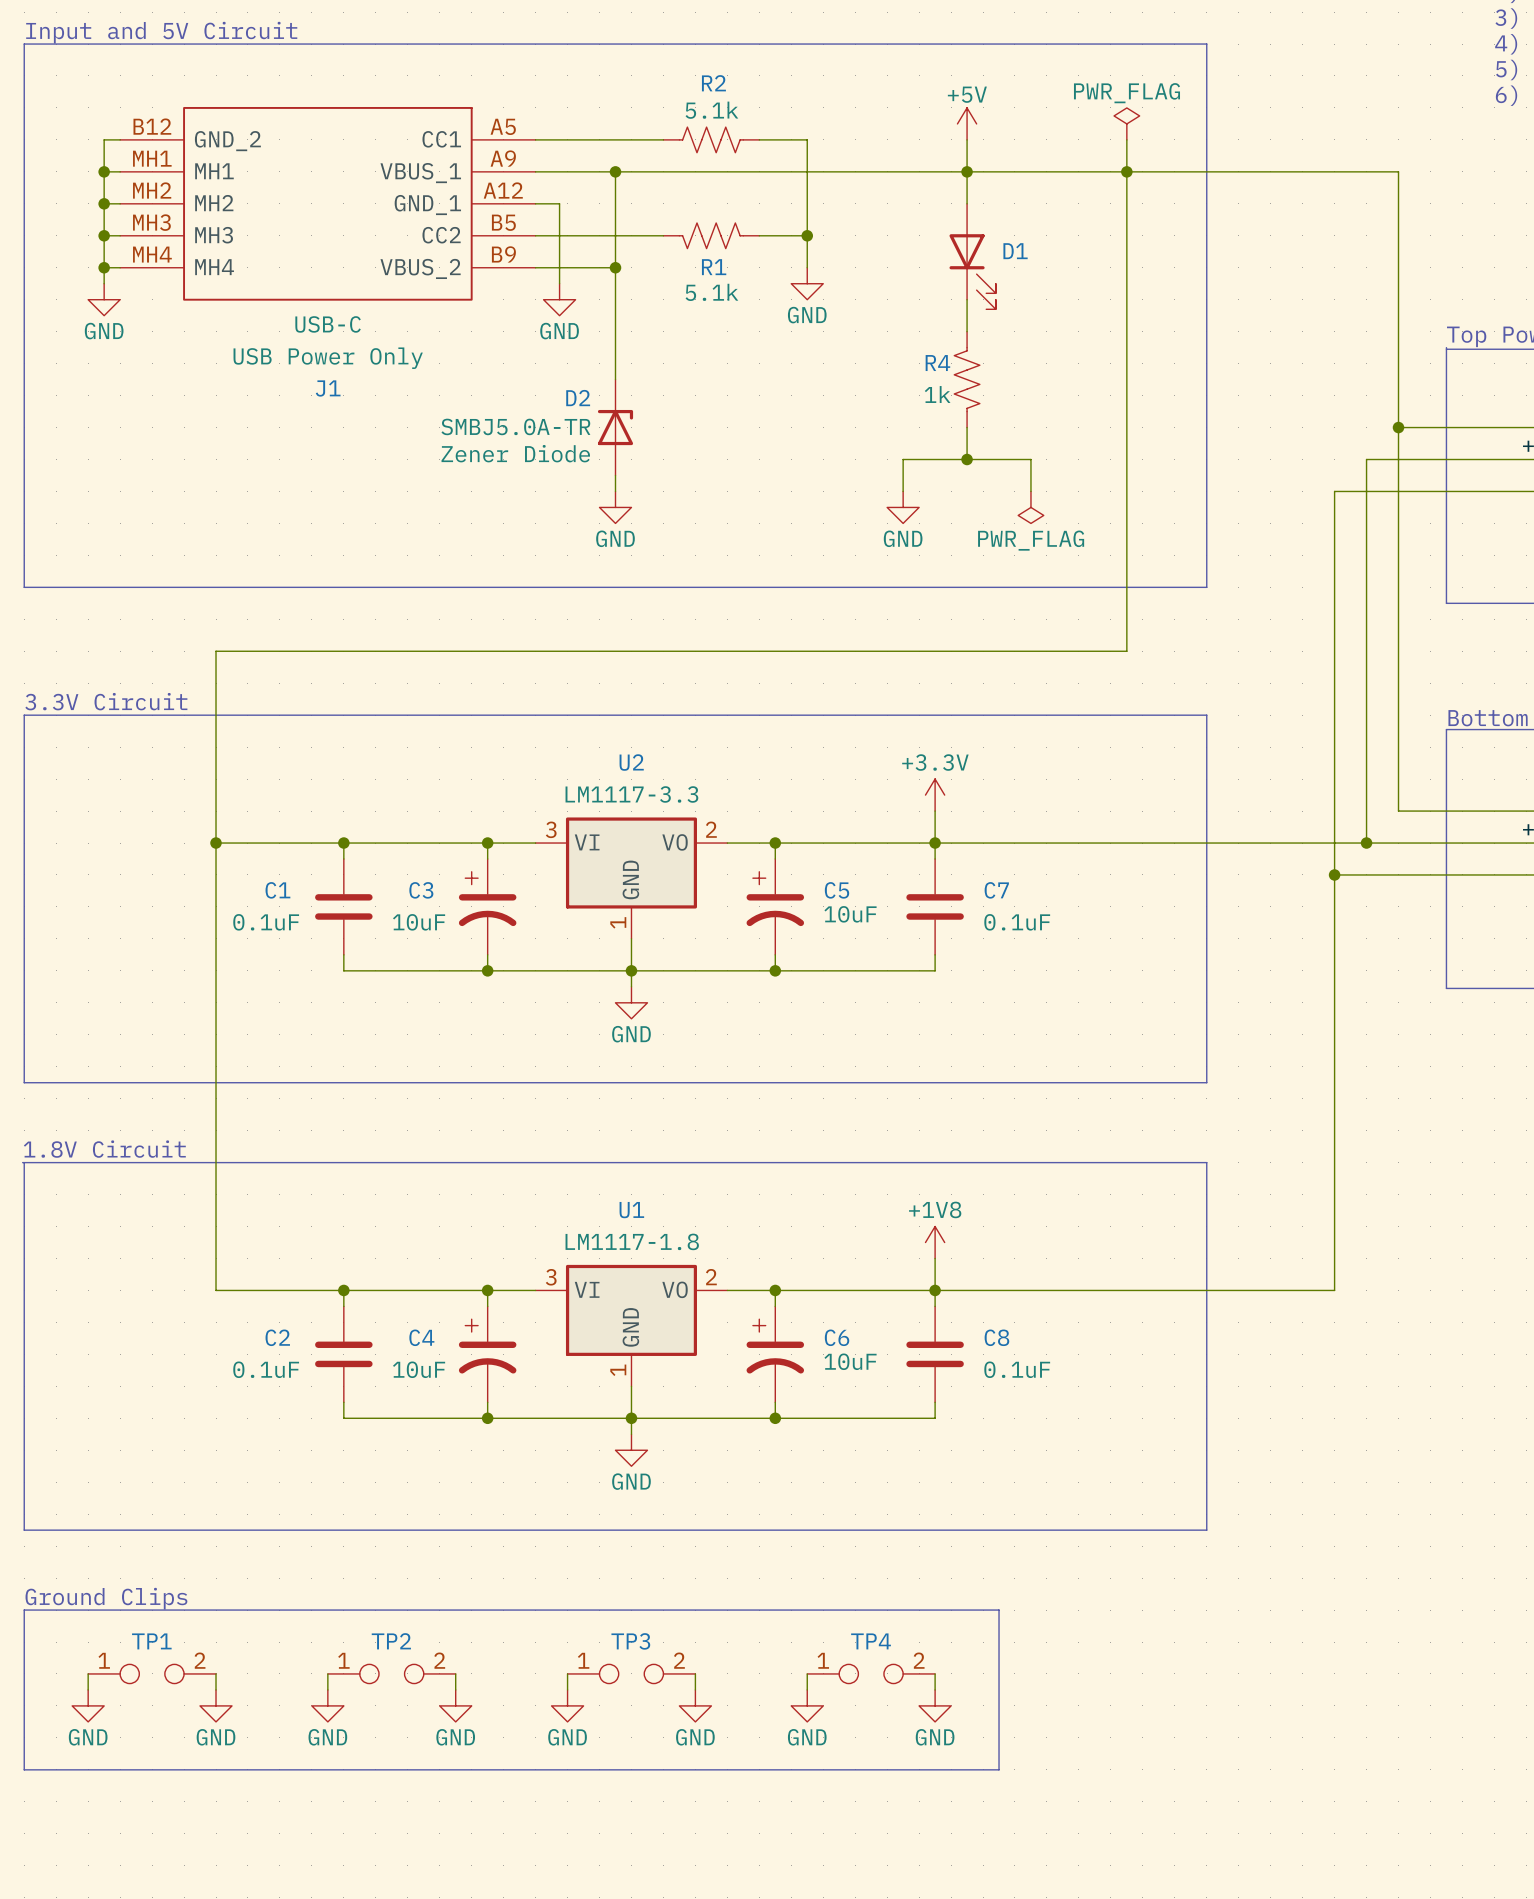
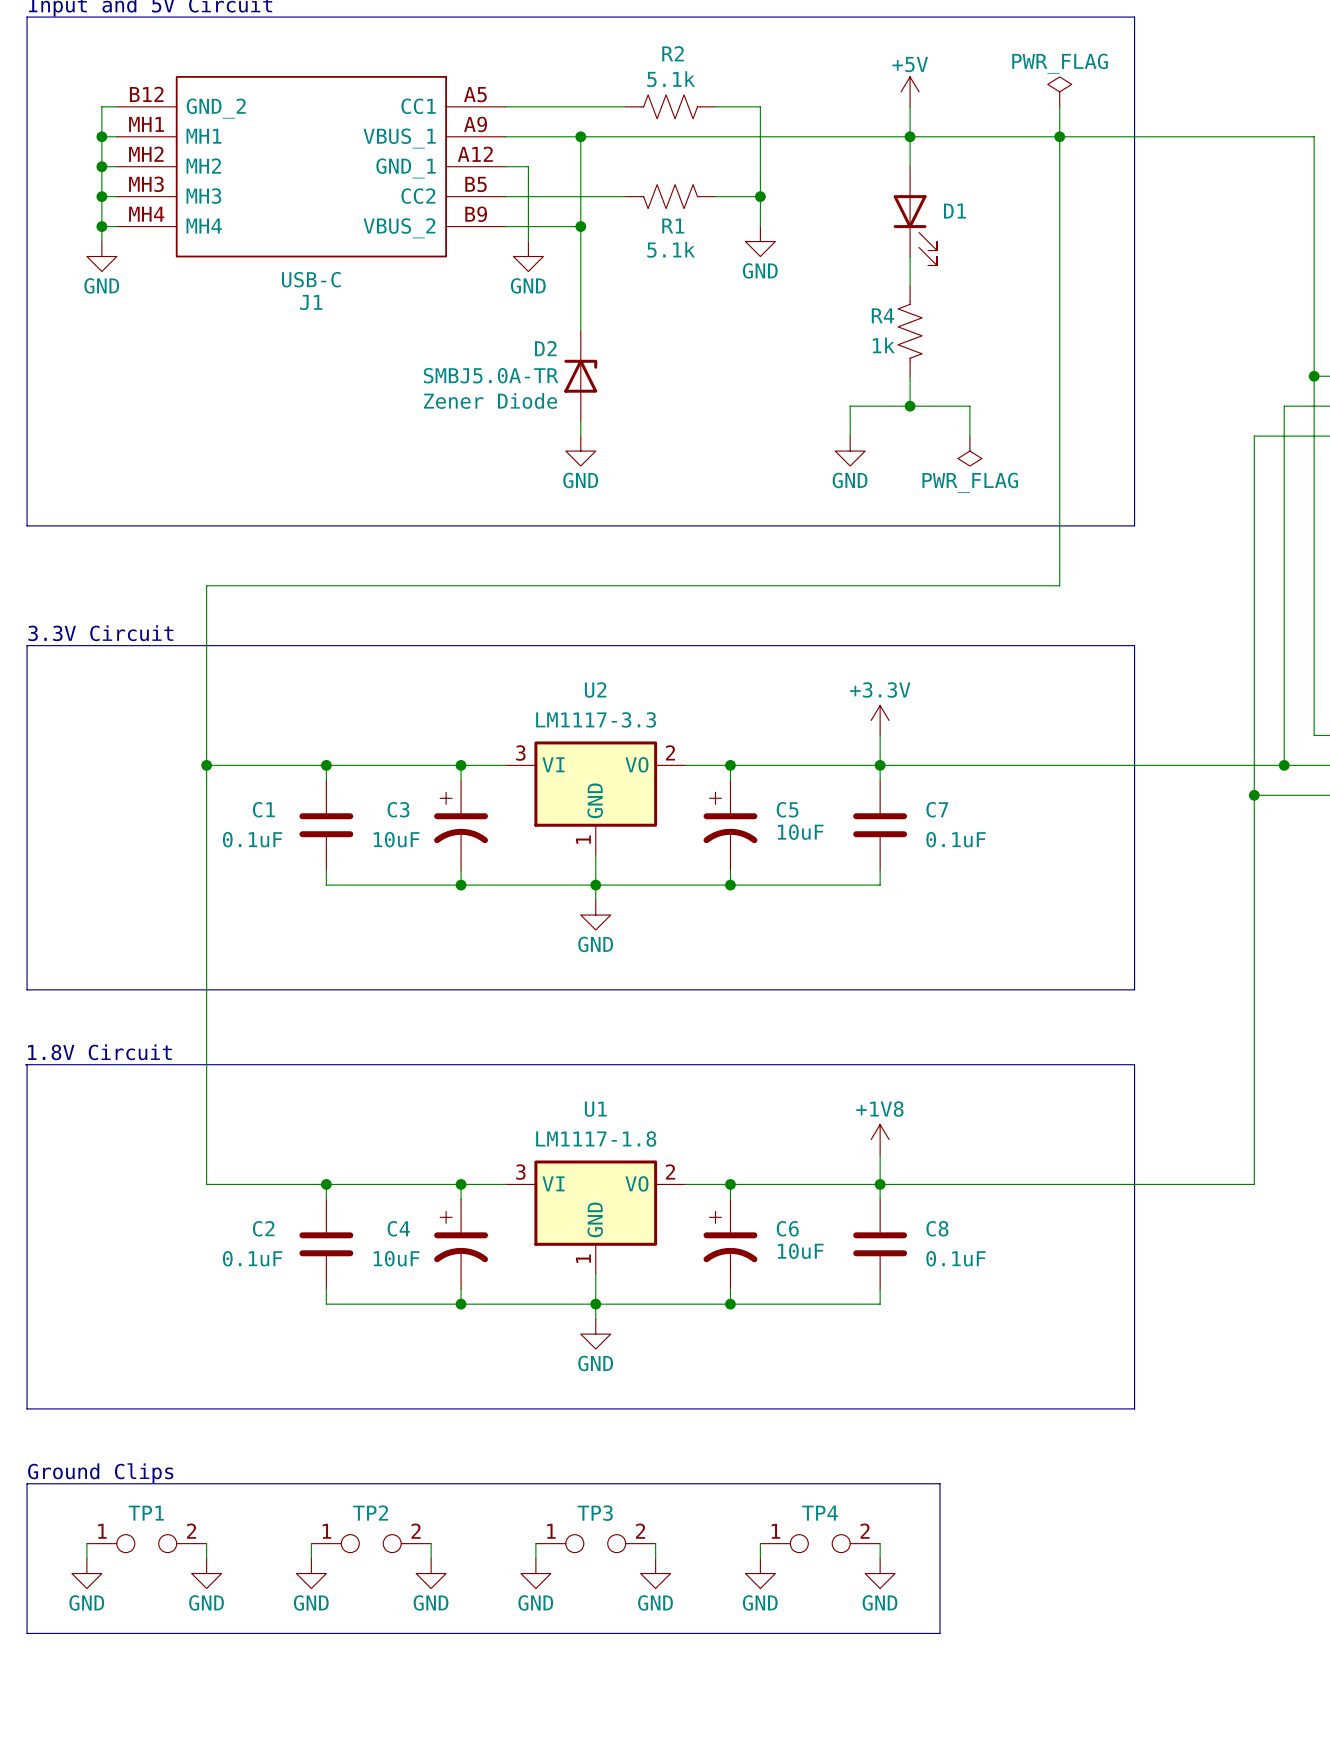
J1 text: USB Power Only (328, 358) -> none
J1 name position: J1 (328, 388) -> J1 (311, 302)

